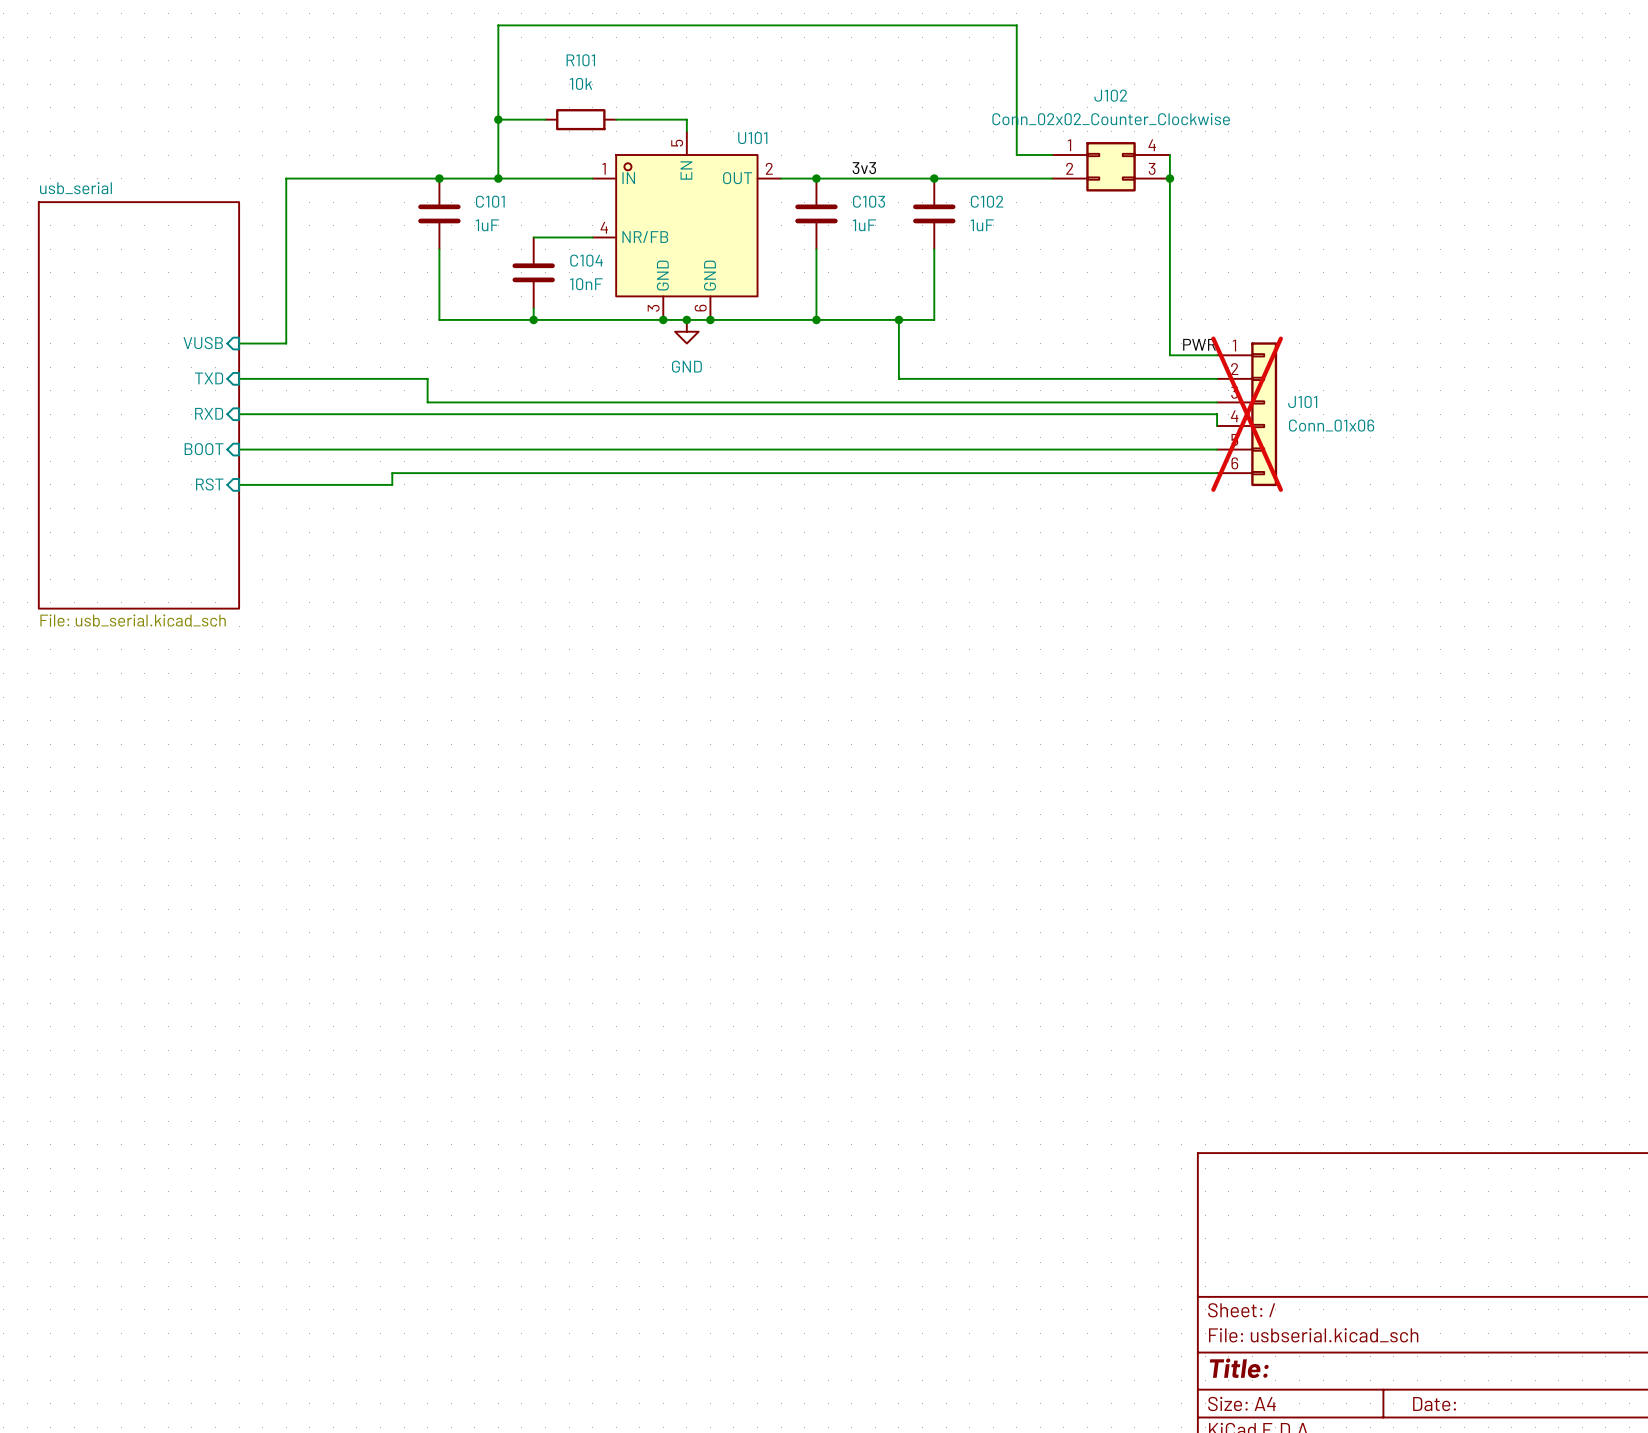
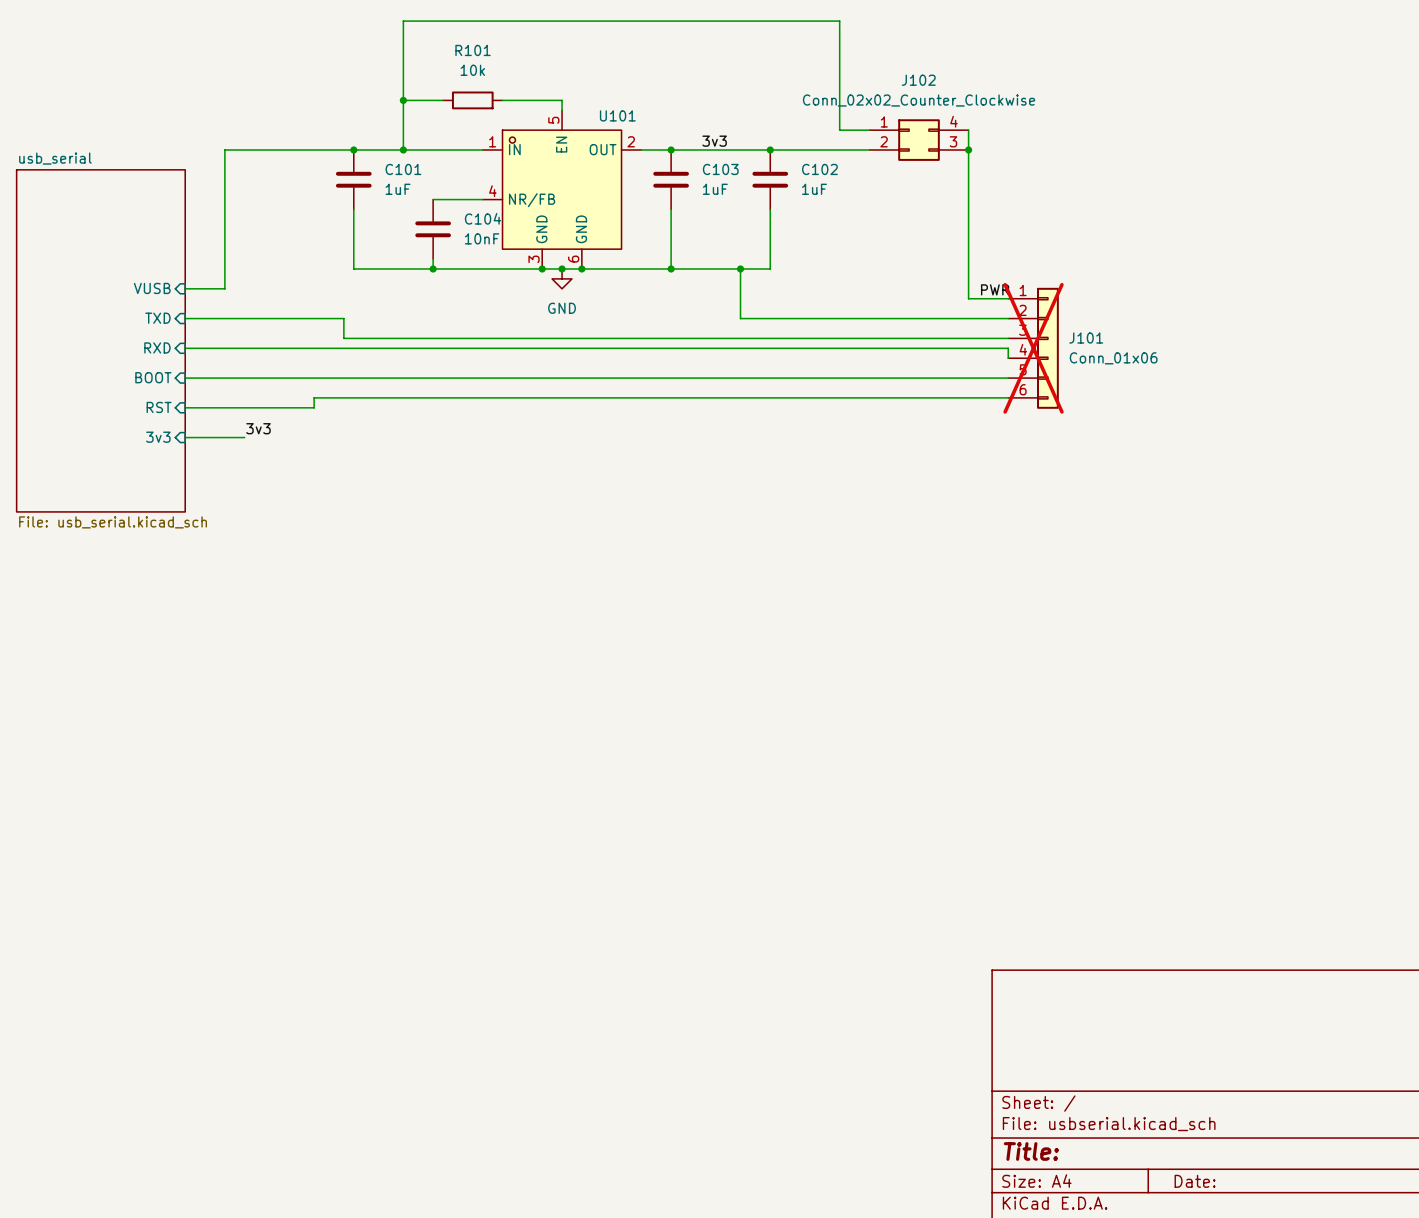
label: none -> 3v3 (258, 428)
sheet pin: none -> 3v3 (158, 437)
wire: none -> (185, 437) (244, 437)

